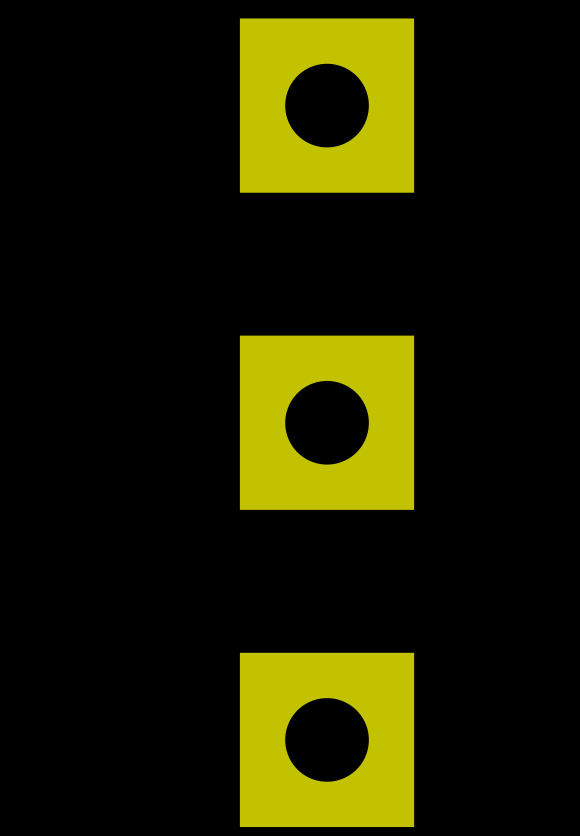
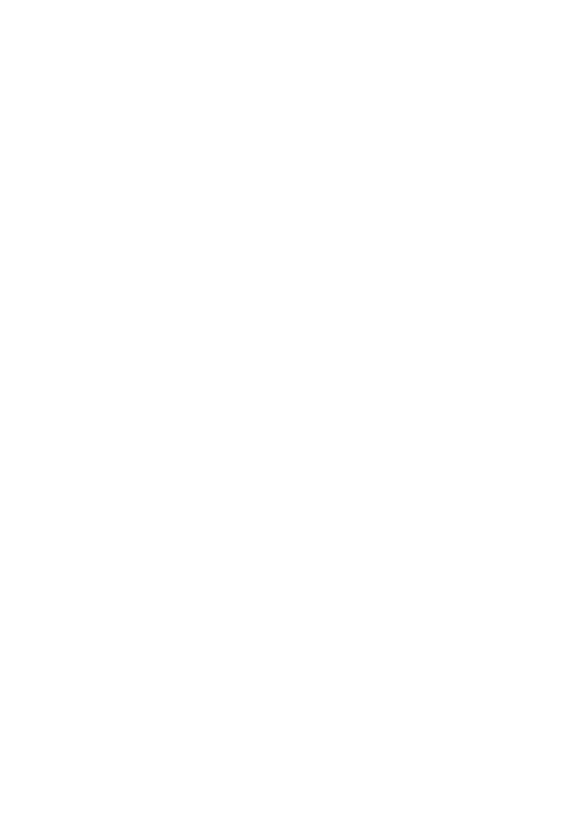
part: (327, 105) -> none
part: (327, 422) -> none
part: (327, 739) -> none

